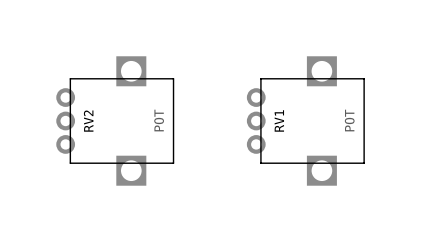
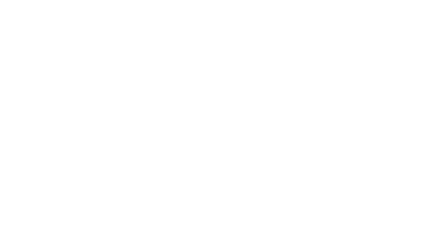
RV2: POT (115, 120) -> none
RV1: POT (305, 120) -> none

